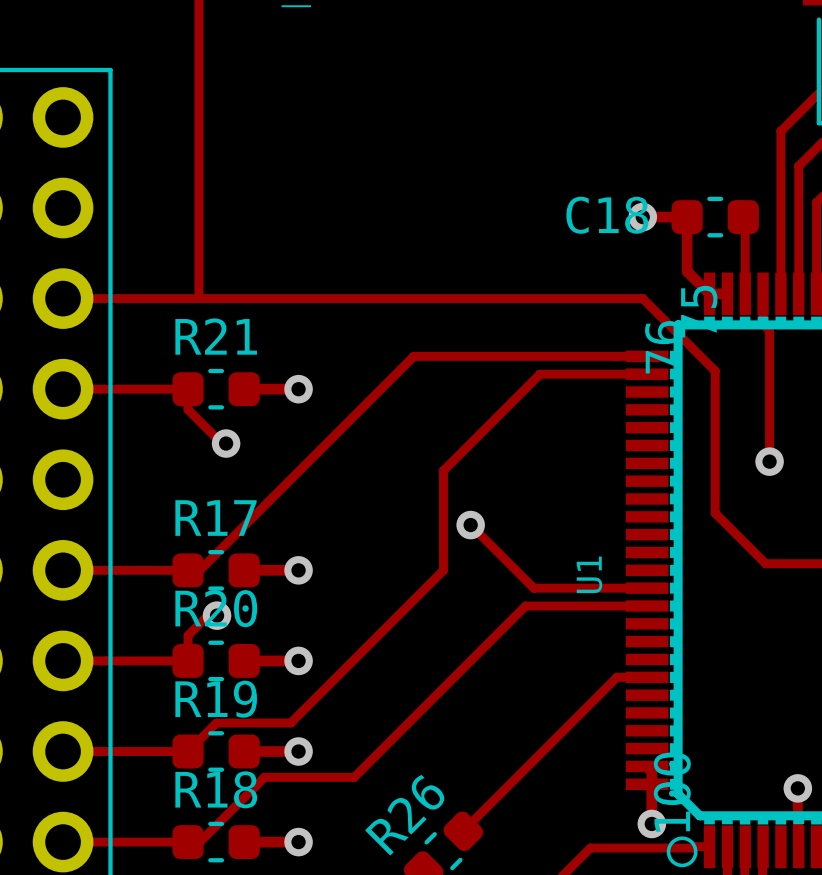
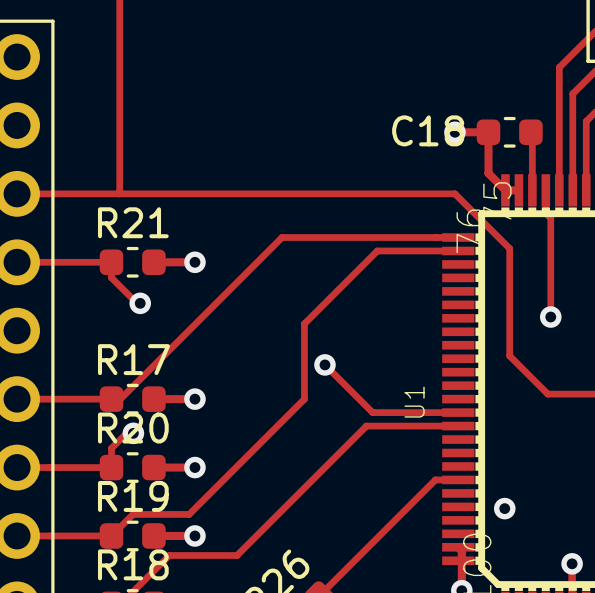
via: none -> (504, 508)

